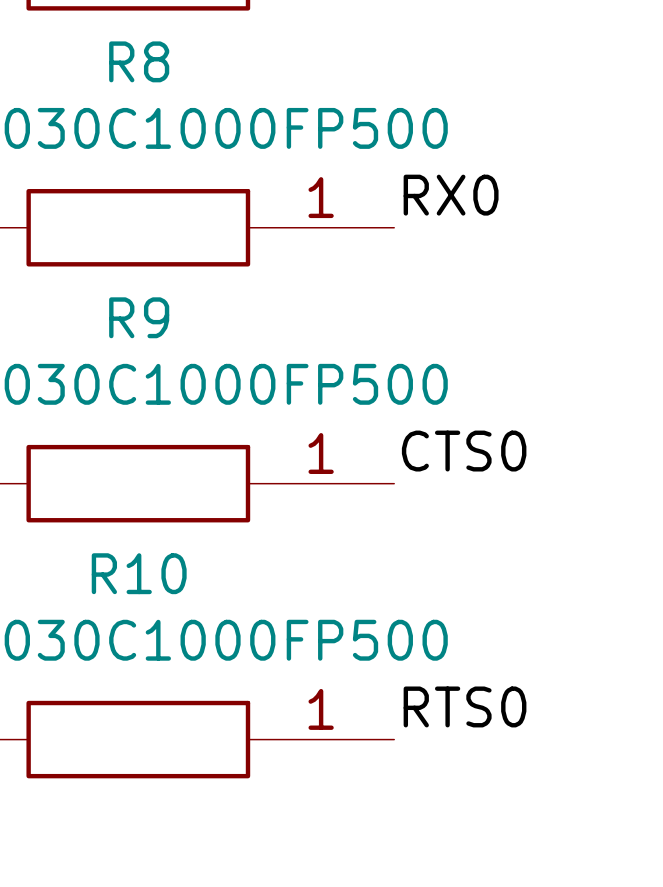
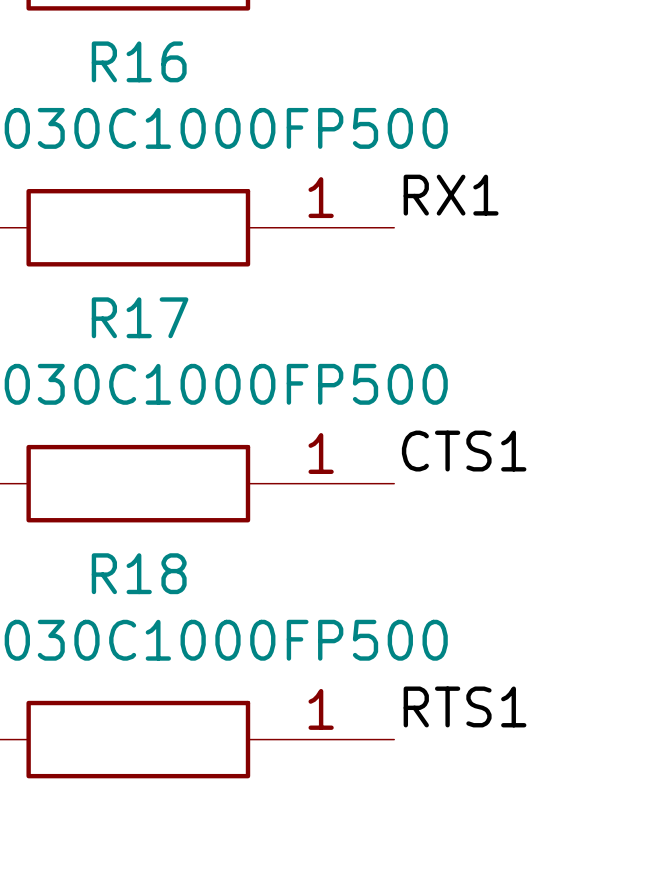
R8 name: R8 (139, 61) -> R16 (139, 61)
label: RX0 (451, 195) -> RX1 (451, 195)
R9 name: R9 (139, 317) -> R17 (140, 317)
label: CTS0 (464, 451) -> CTS1 (464, 451)
R10 name: R10 (139, 573) -> R18 (139, 573)
label: RTS0 (465, 706) -> RTS1 (465, 706)

